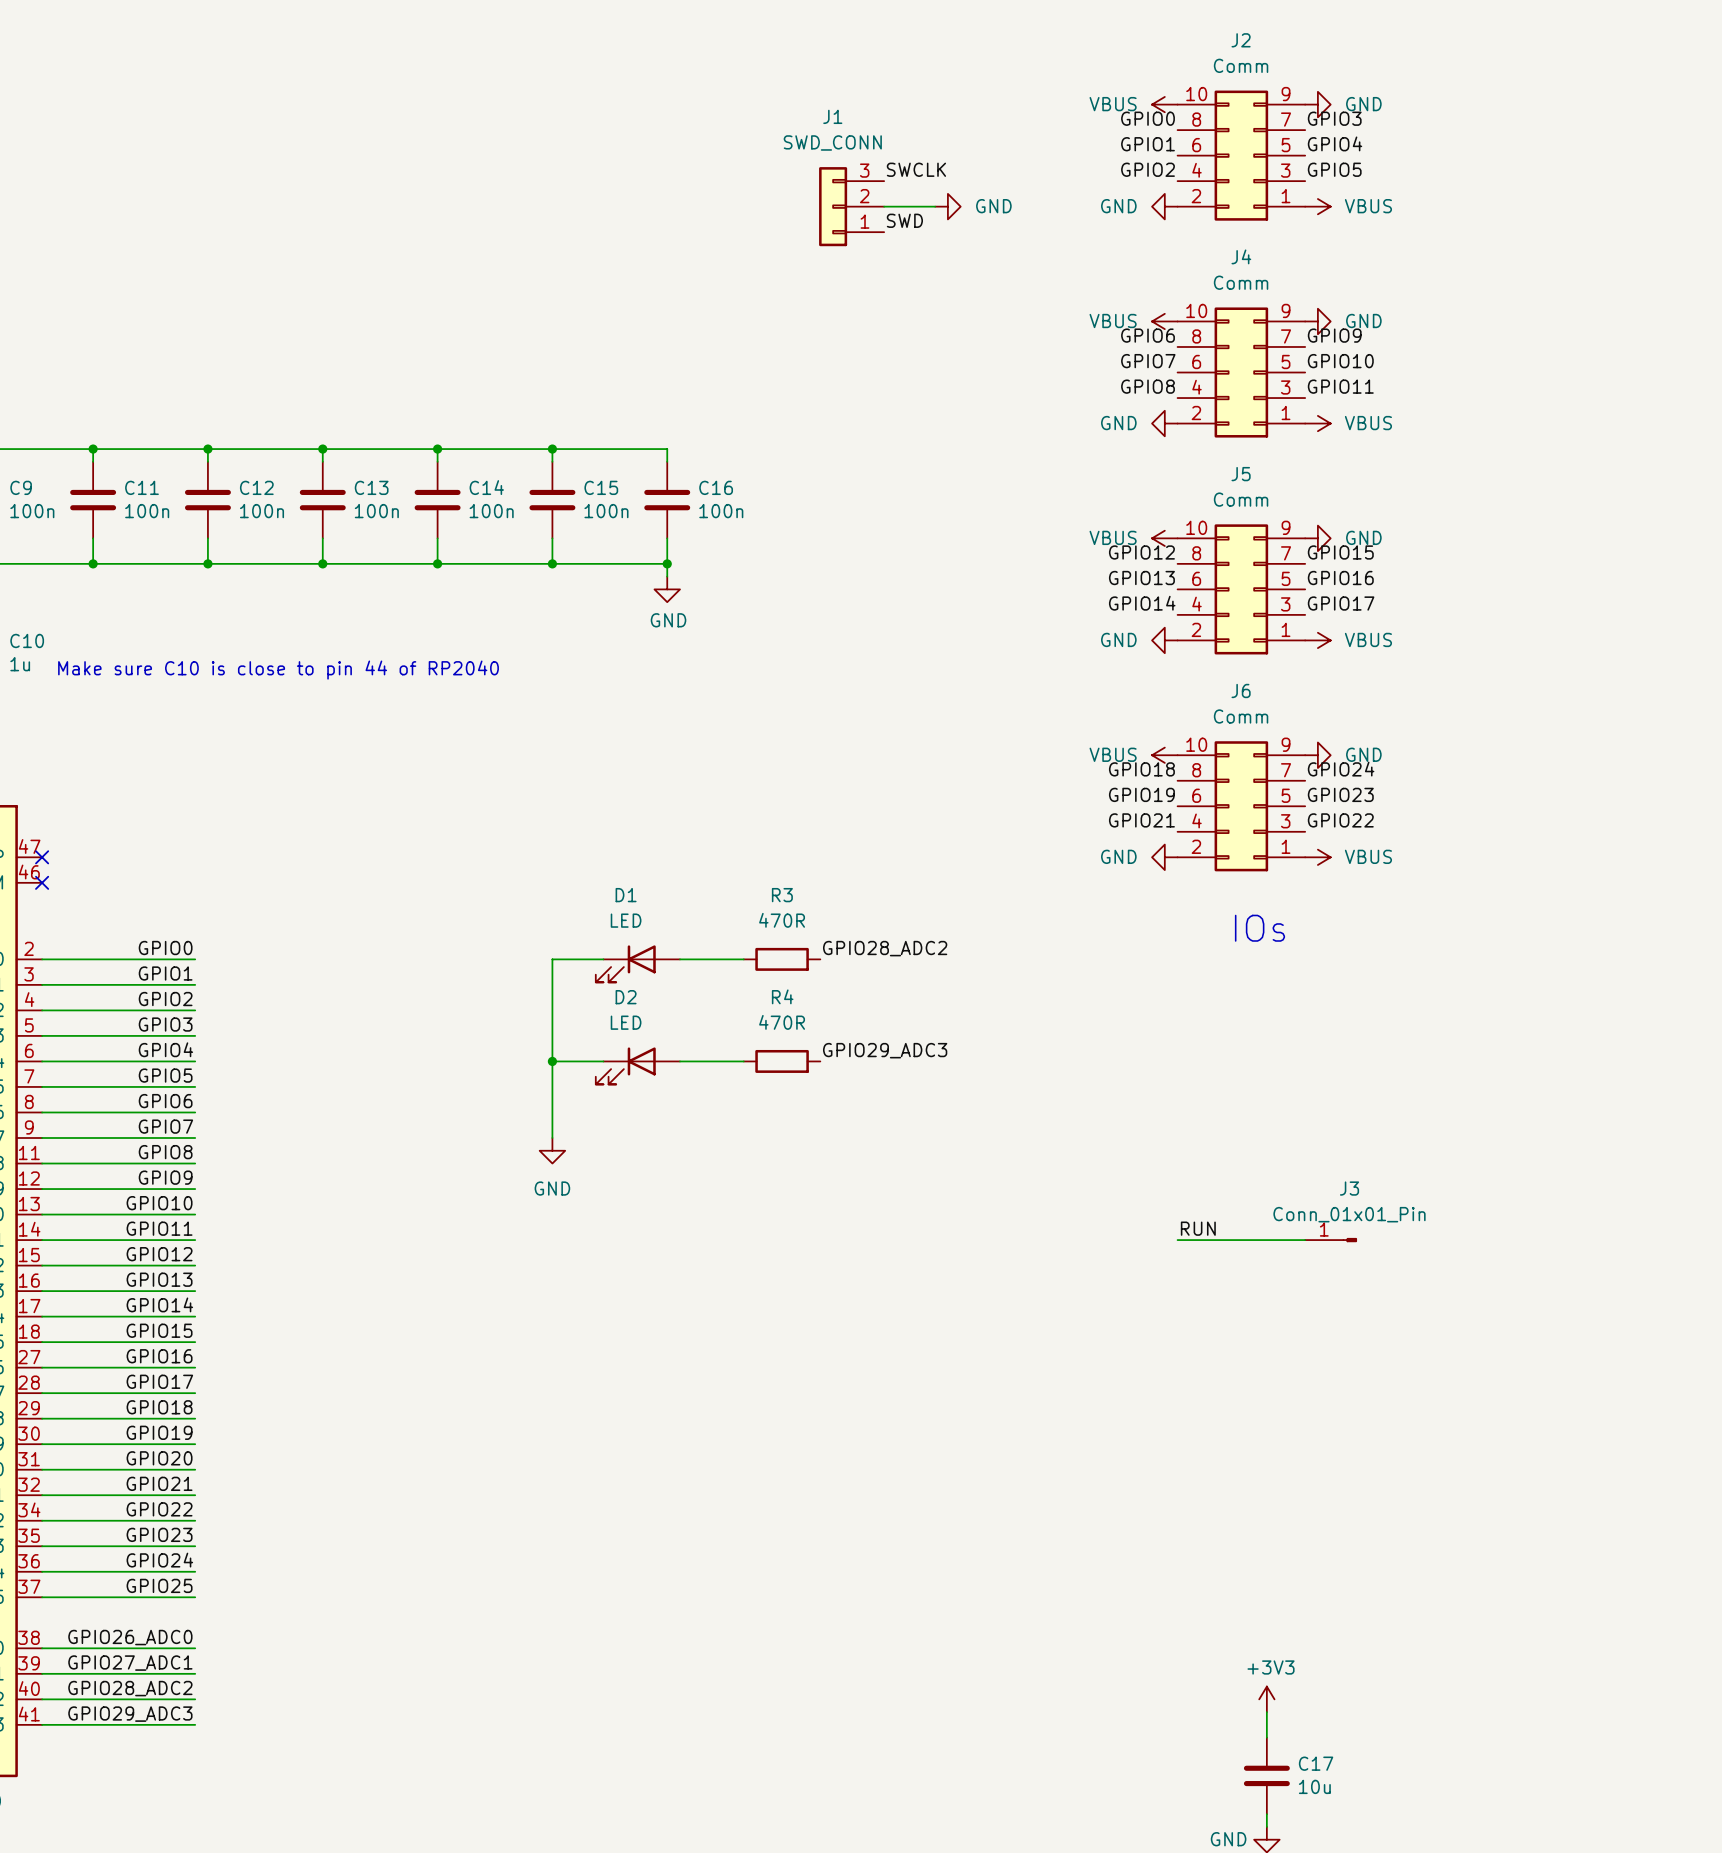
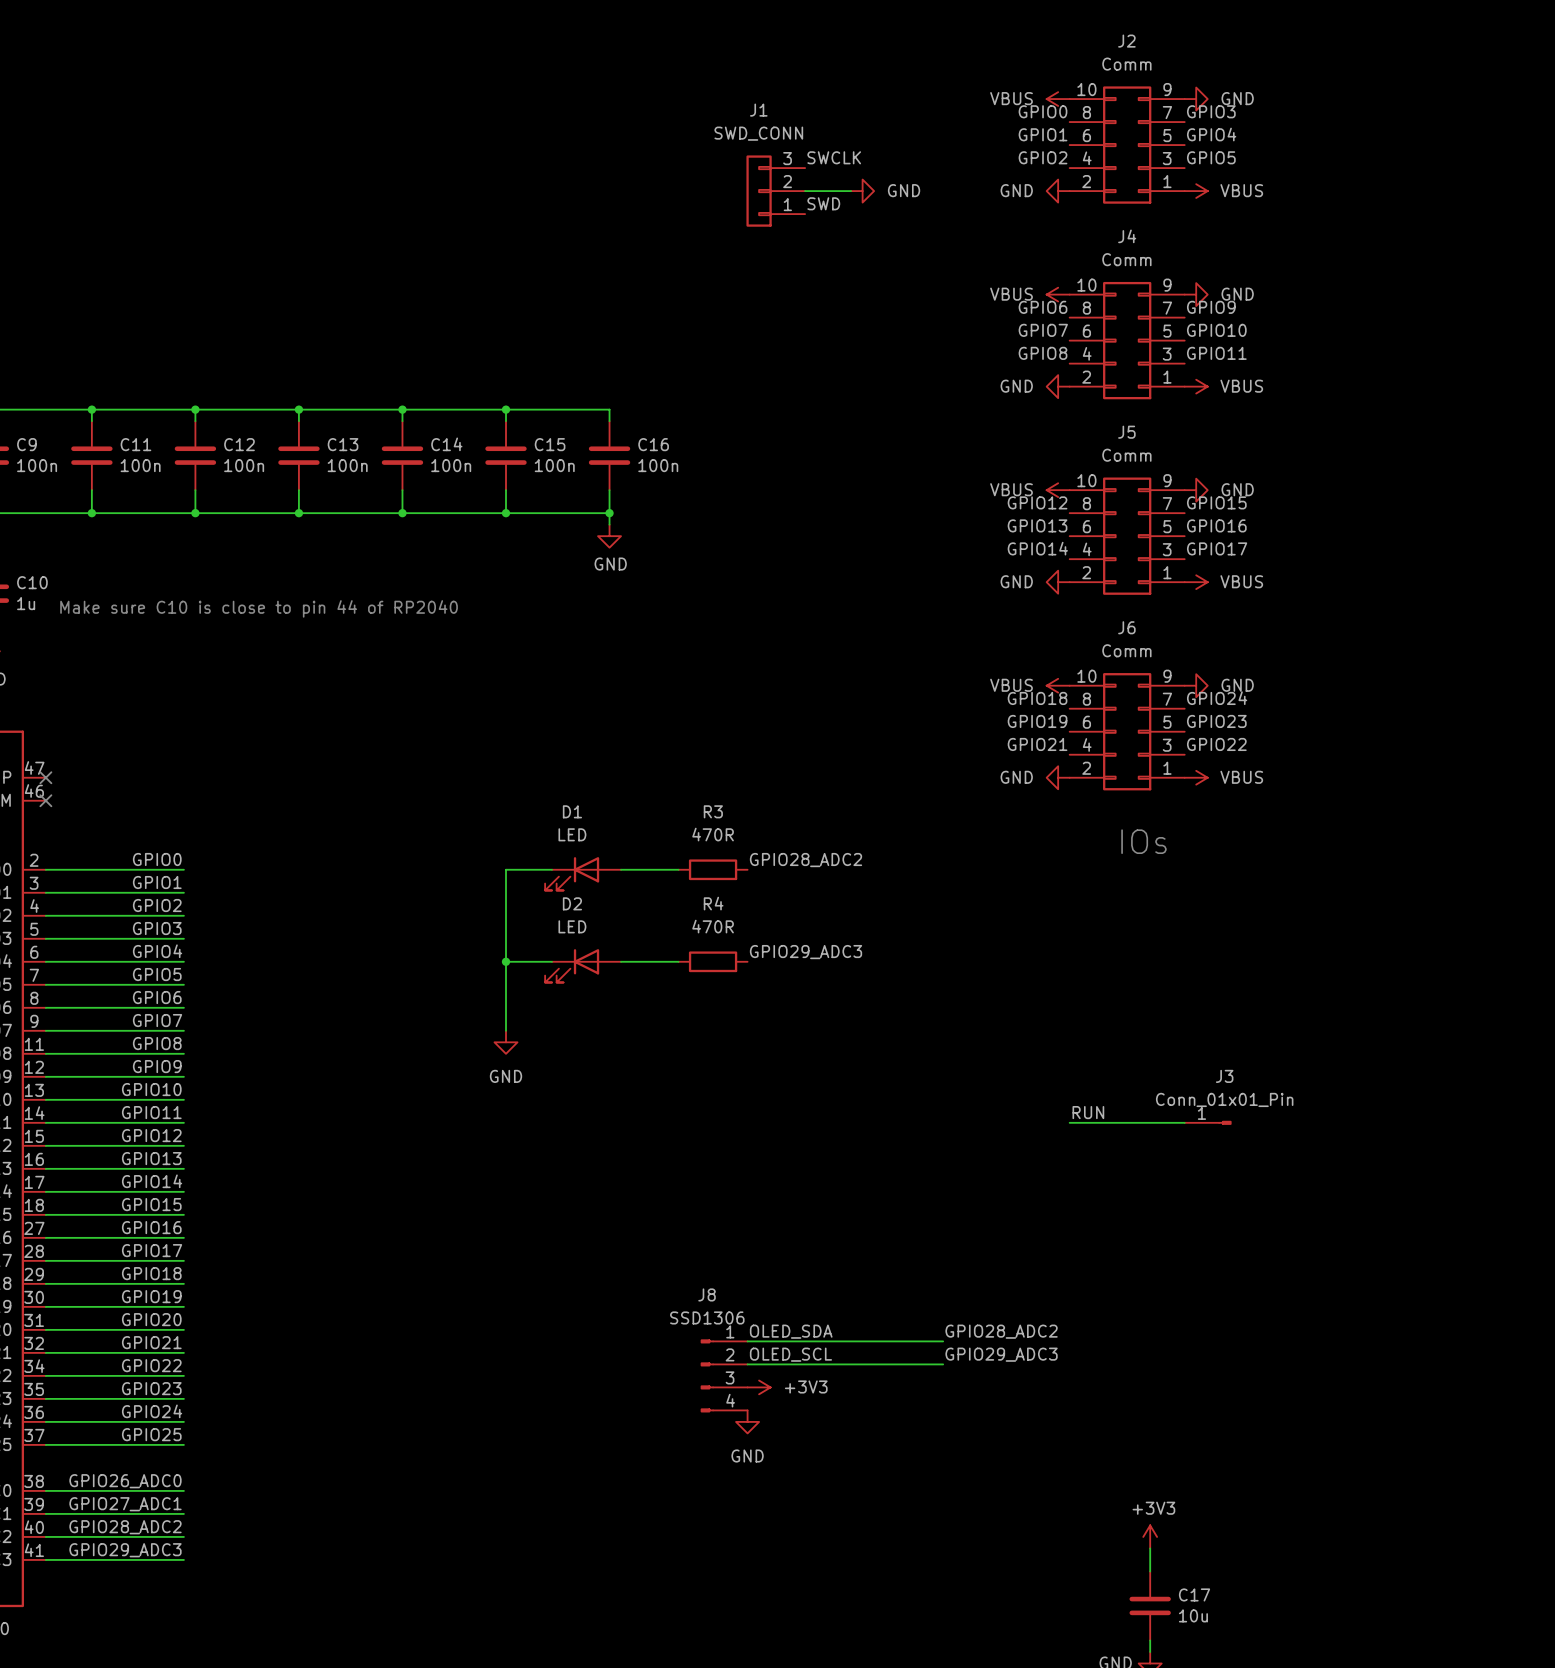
label: none -> OLED_SDA (791, 1331)
label: none -> GPIO28_ADC2 (1001, 1331)
wire: none -> (747, 1341) (943, 1341)
label: none -> OLED_SCL (790, 1354)
label: none -> GPIO29_ADC3 (1001, 1354)
wire: none -> (747, 1364) (943, 1364)
J8: none -> SSD1306 (724, 1375)
power symbol: none -> +3V3 (759, 1387)
power symbol: none -> GND (747, 1421)

